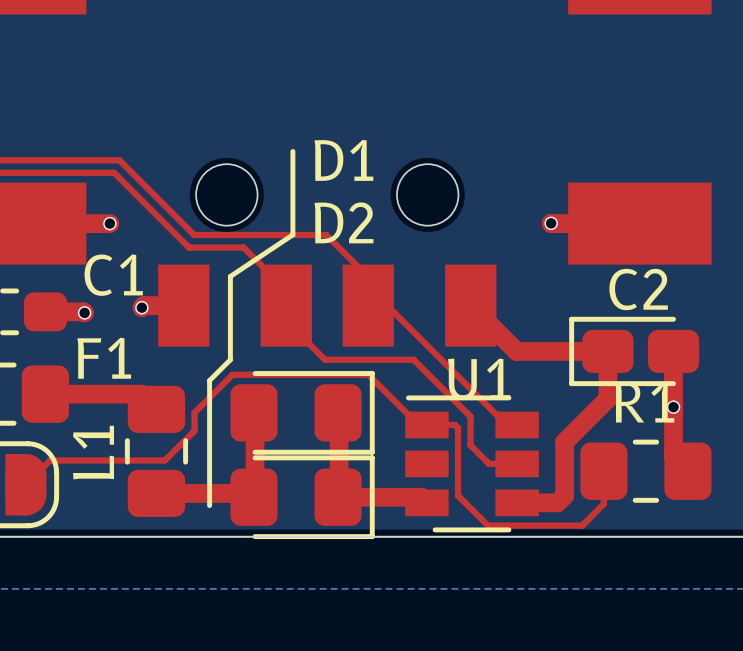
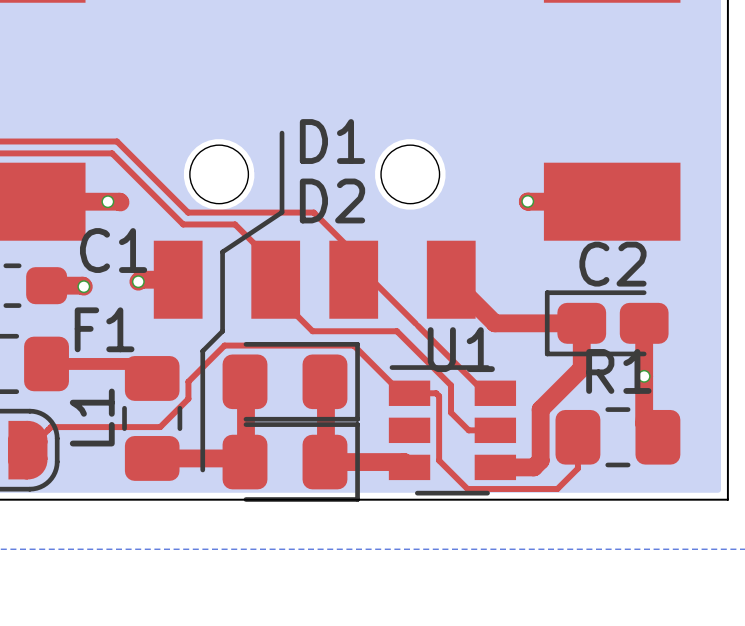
top track: none -> (107, 201) (120, 202)
top track width: thick (45, 394) (141, 394) (156, 409) -> thin (46, 363) (137, 363) (152, 378)

